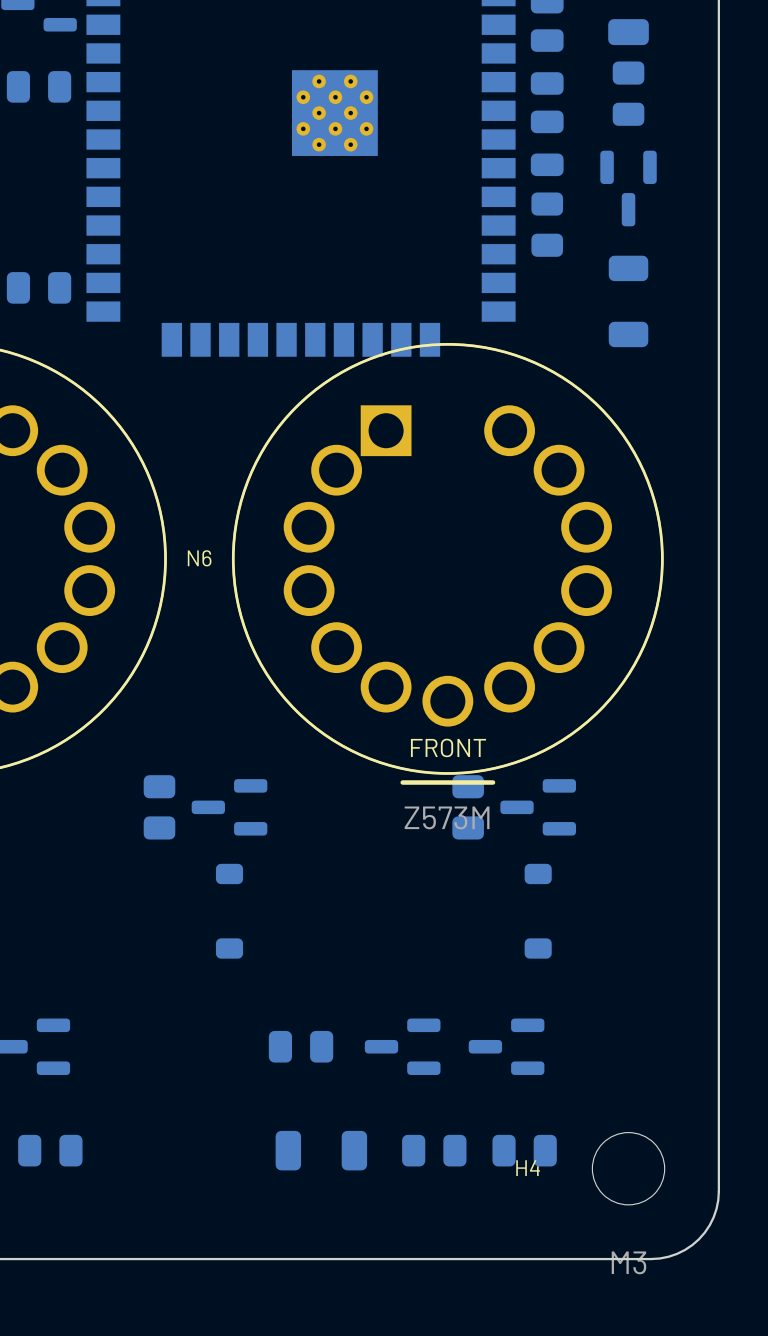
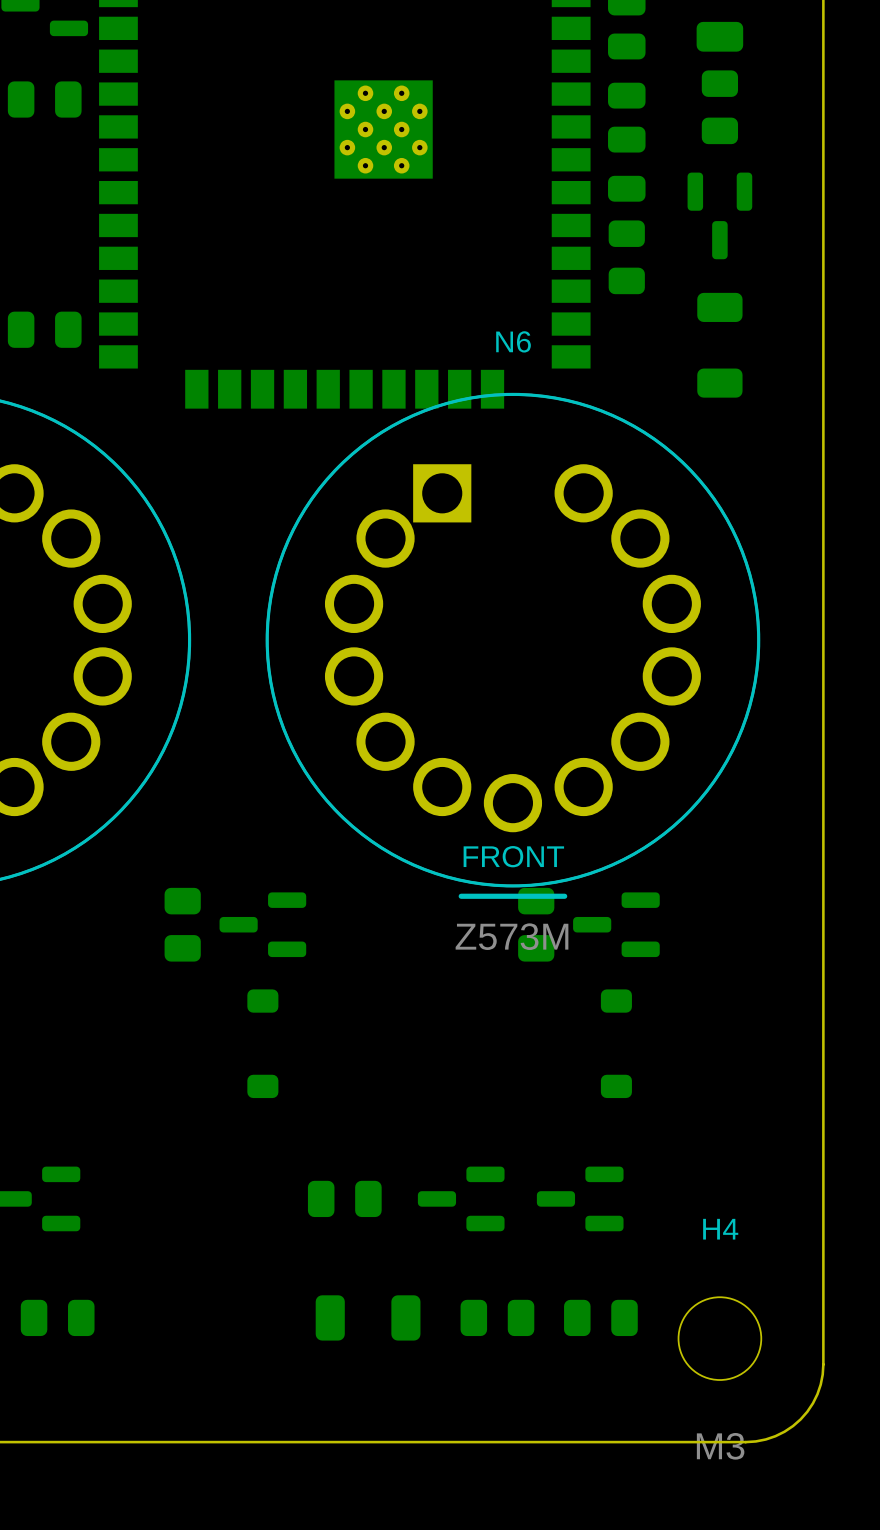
N6 name position: N6 (199, 558) -> N6 (513, 341)
H4 name position: H4 (528, 1168) -> H4 (720, 1229)

